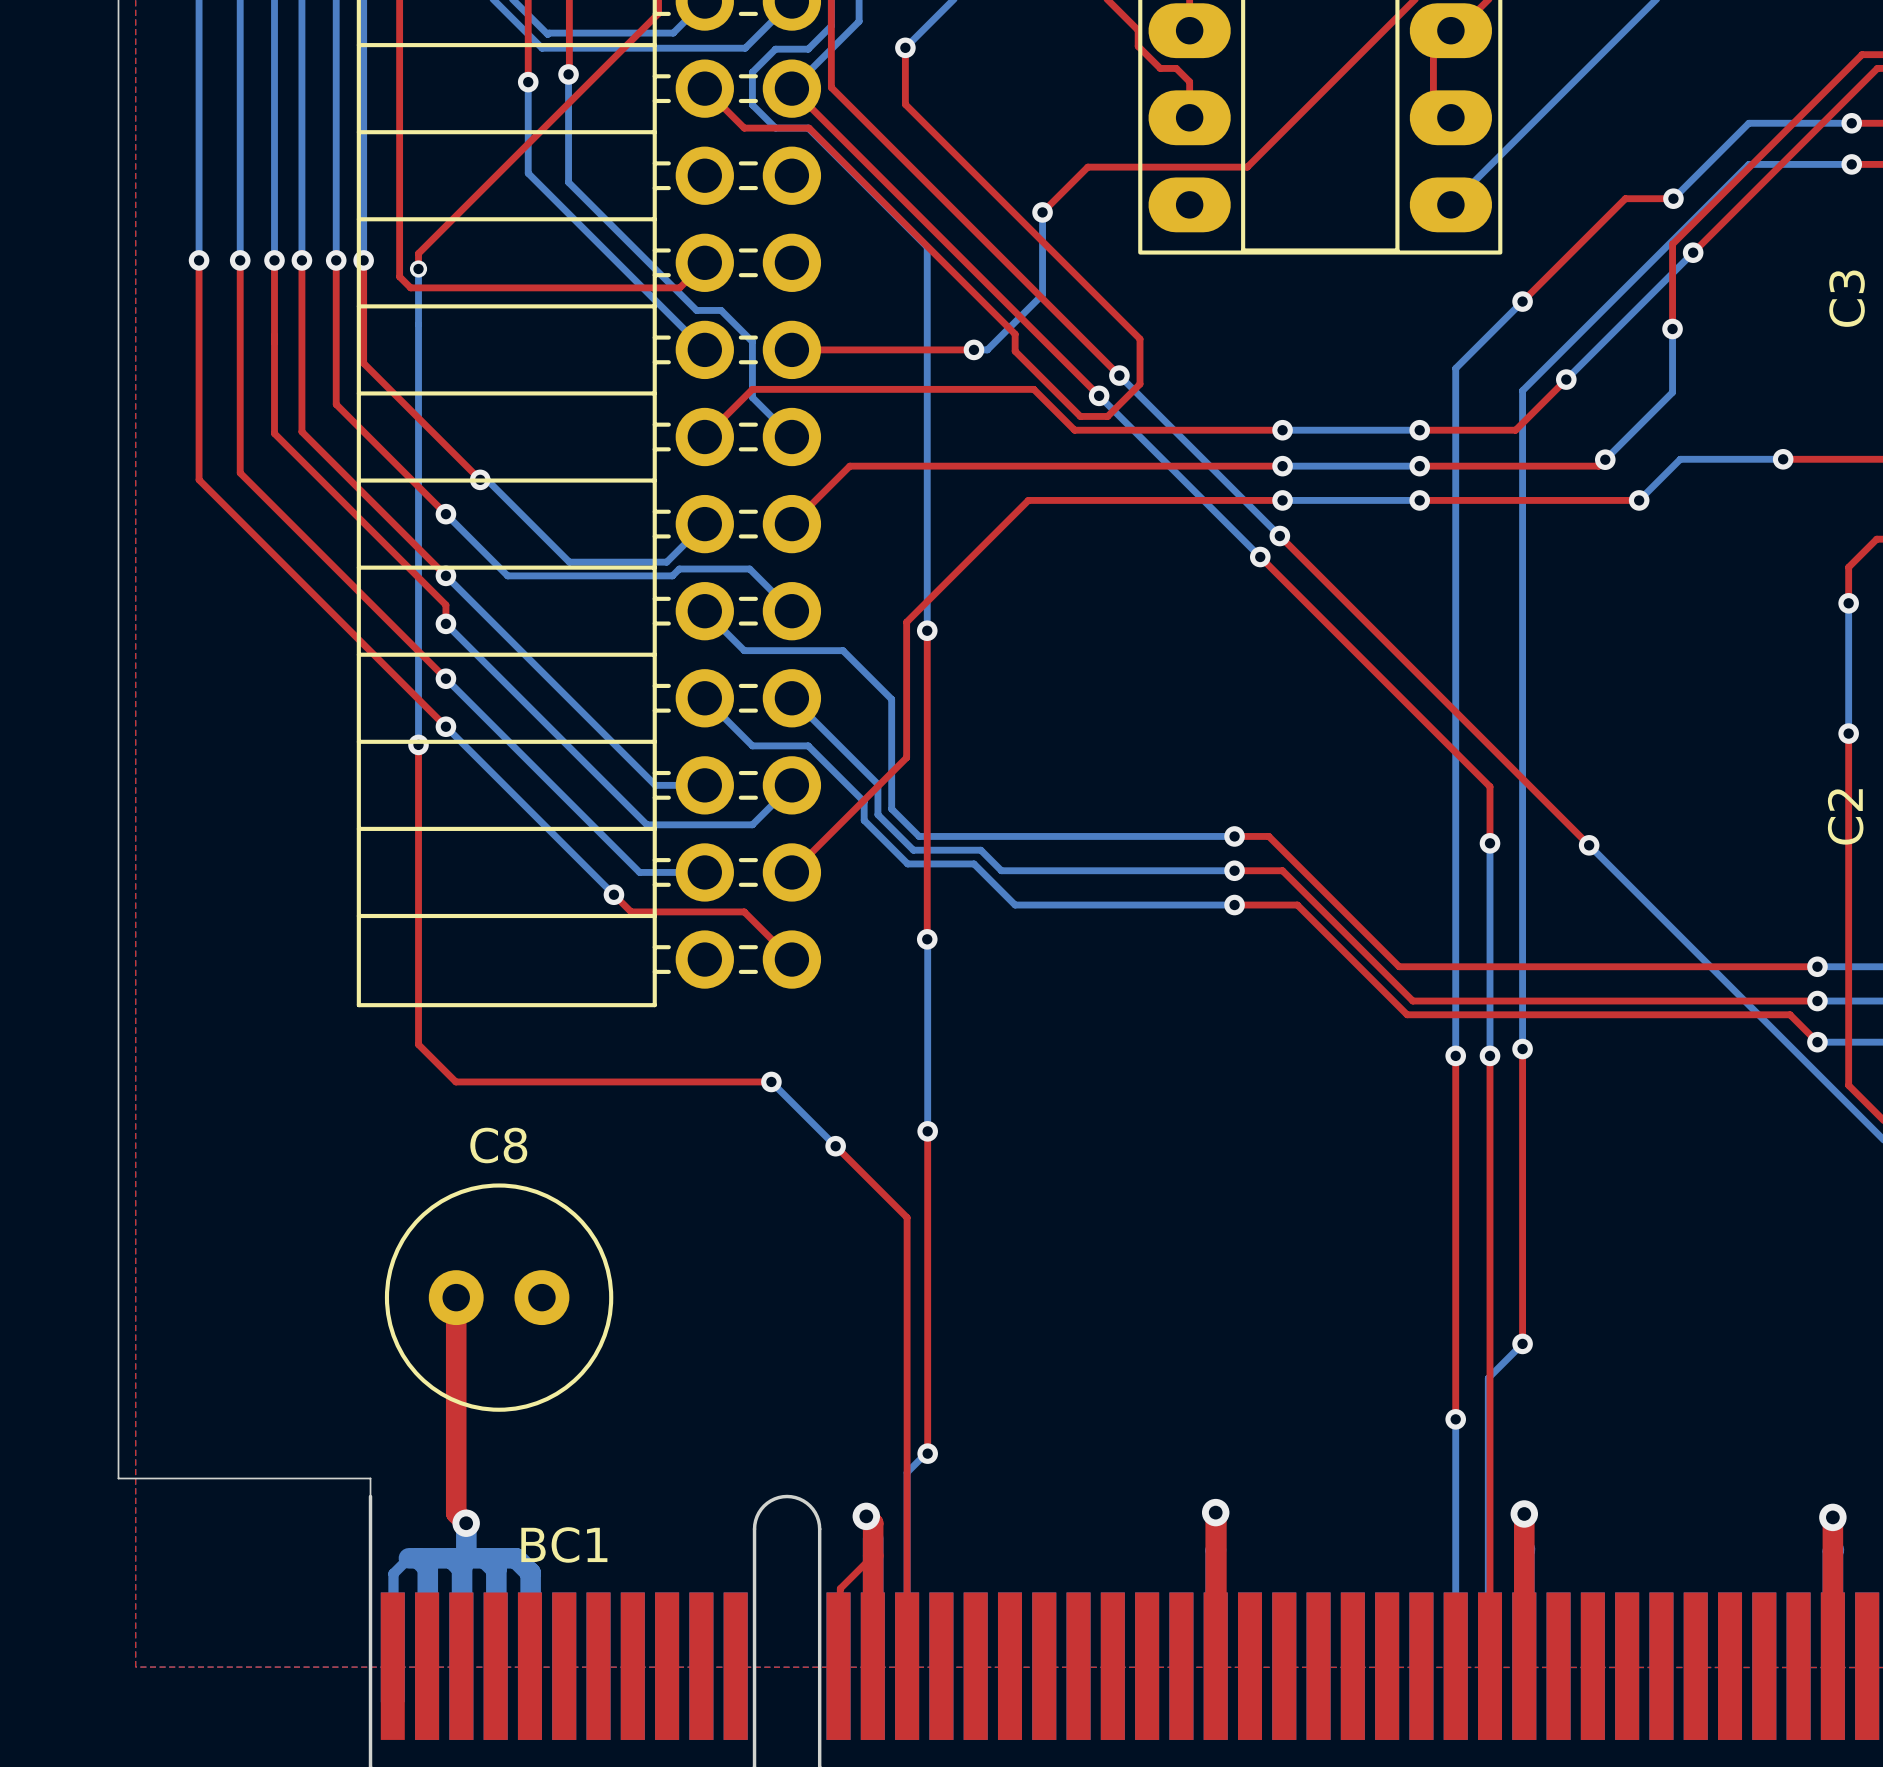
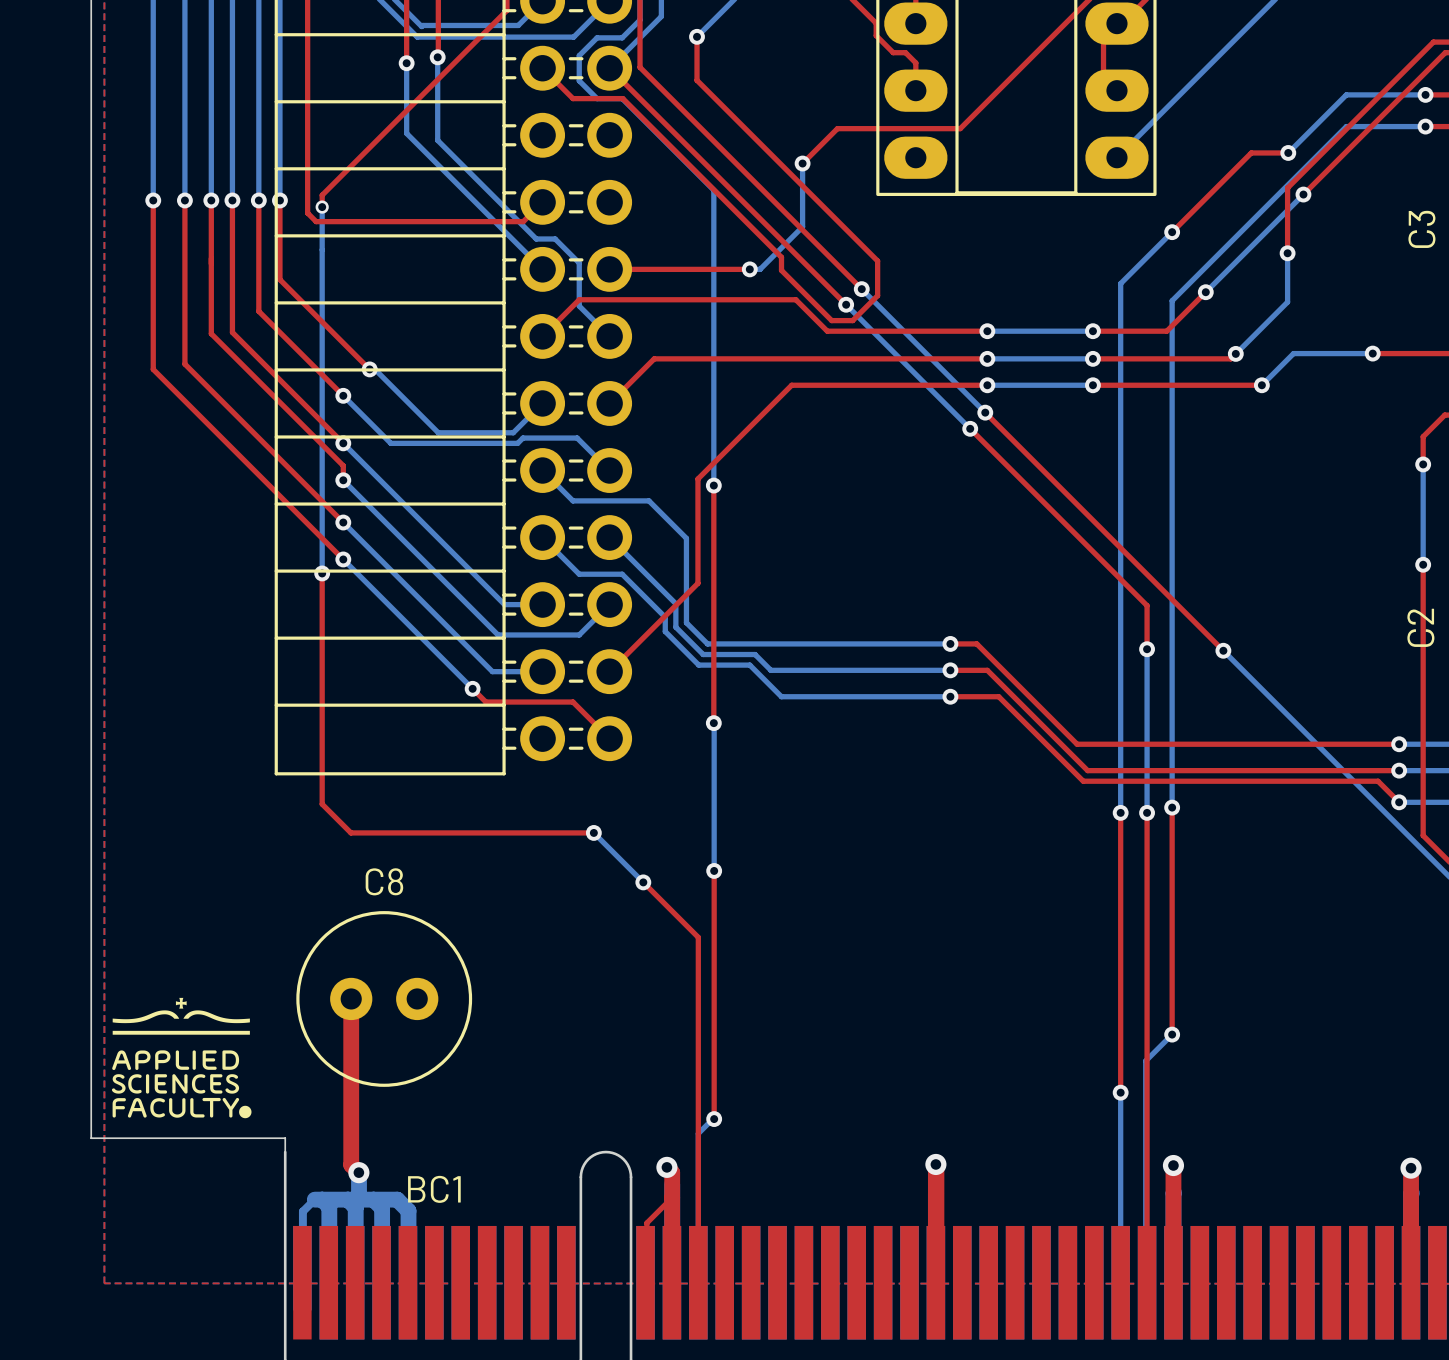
drawing: none -> [111, 997, 252, 1119]

